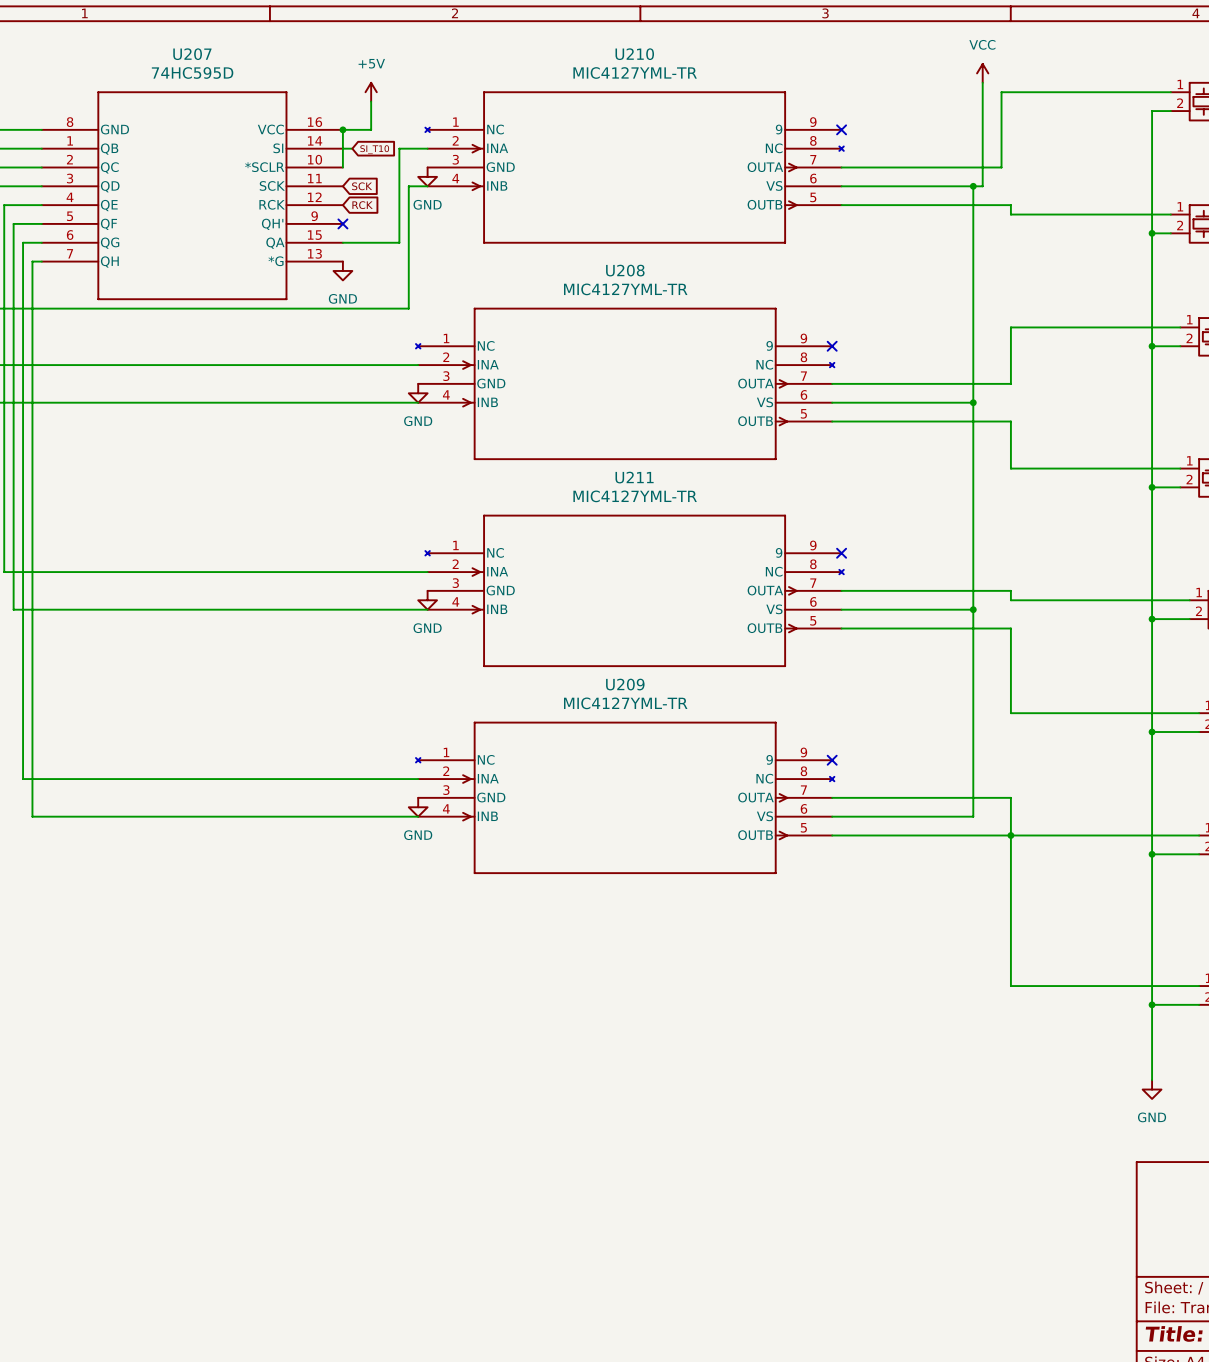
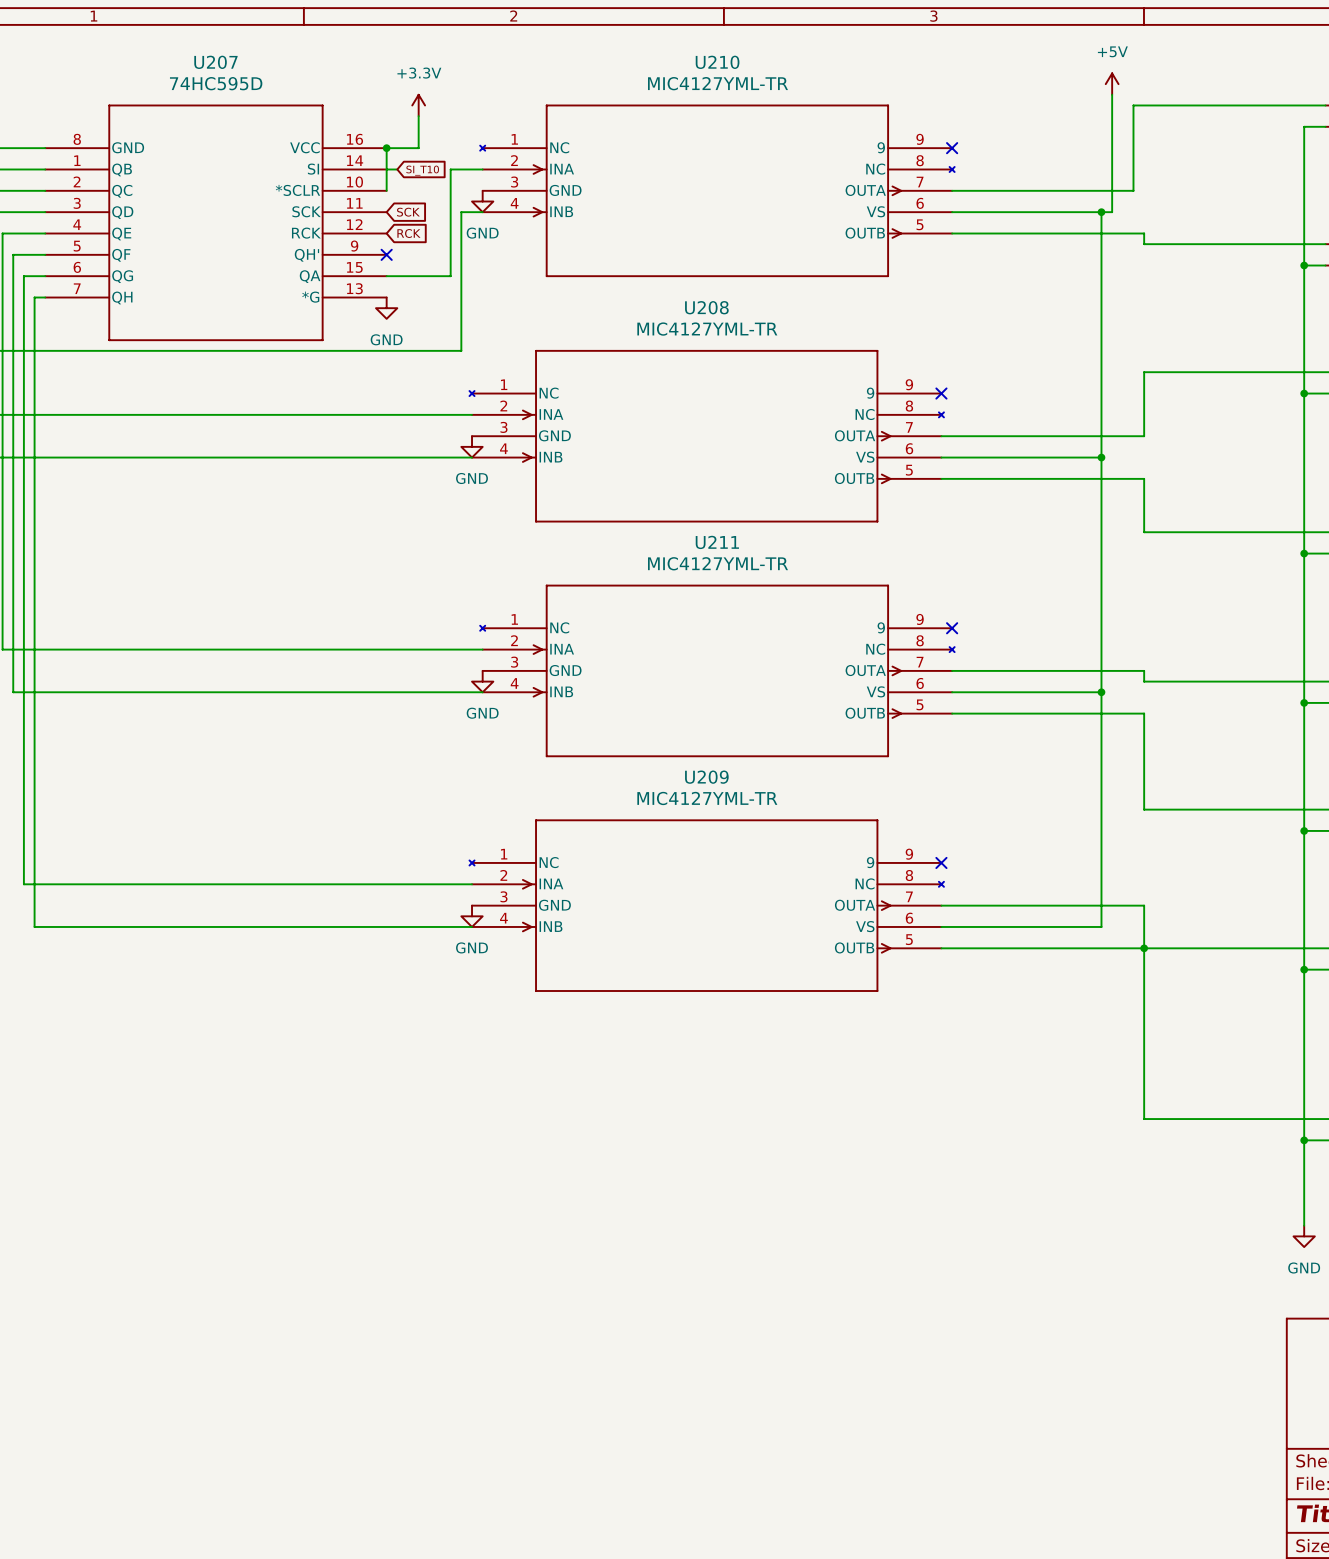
power symbol: VCC (982, 73) -> +5V (1112, 84)
power symbol: +5V (371, 92) -> +3.3V (418, 105)

